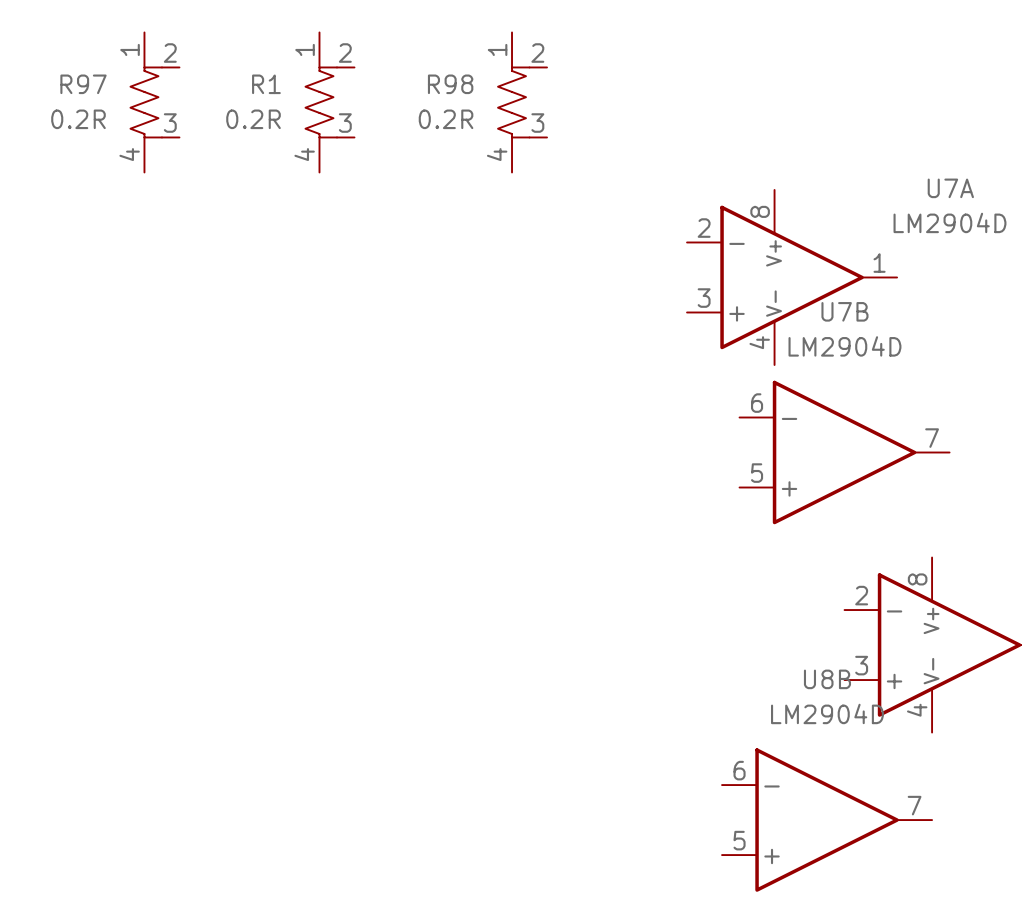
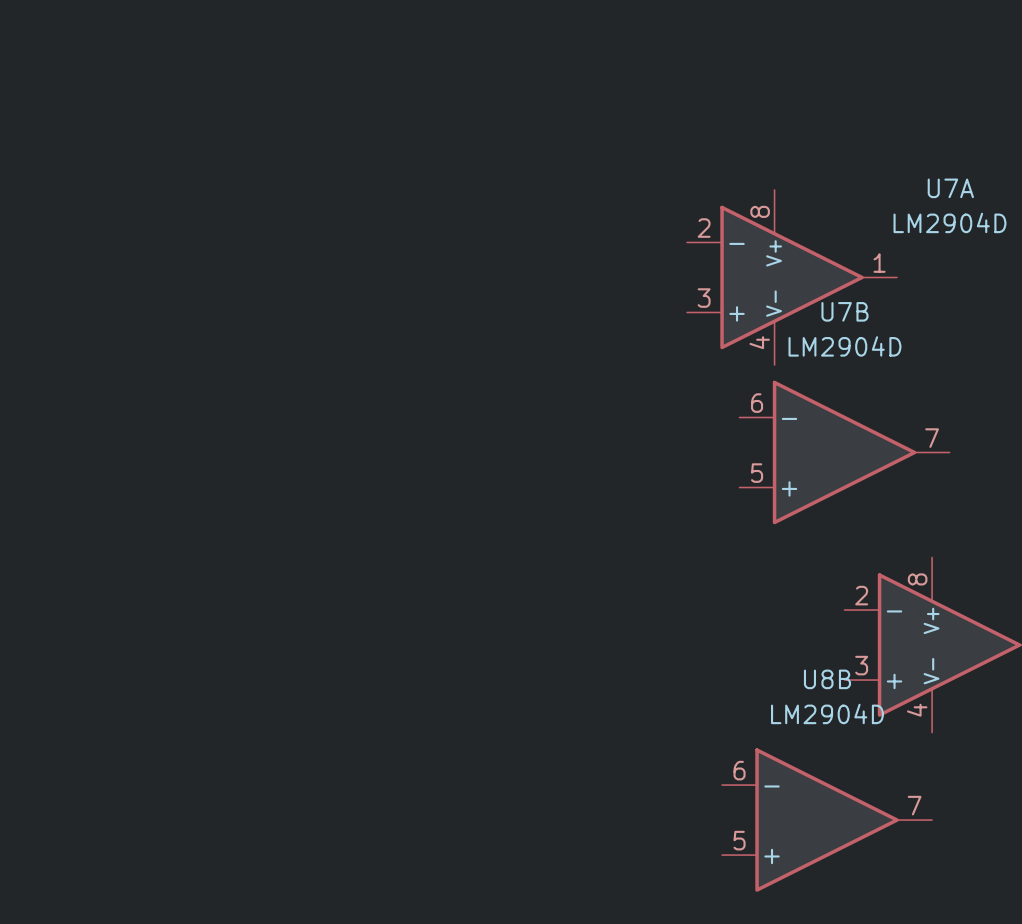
R97: 0.2R (154, 102) -> none
R1: 0.2R (329, 102) -> none
R98: 0.2R (522, 102) -> none

